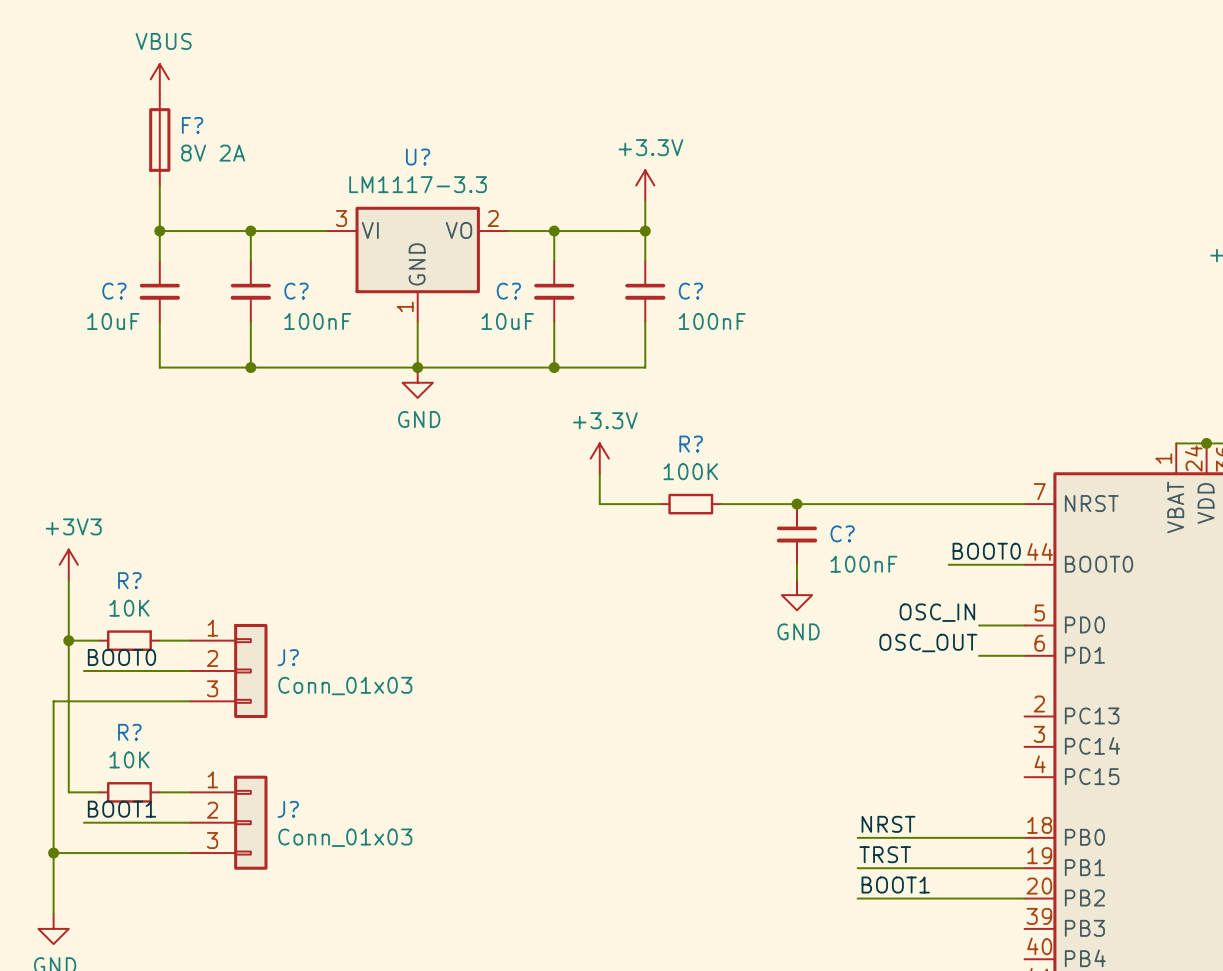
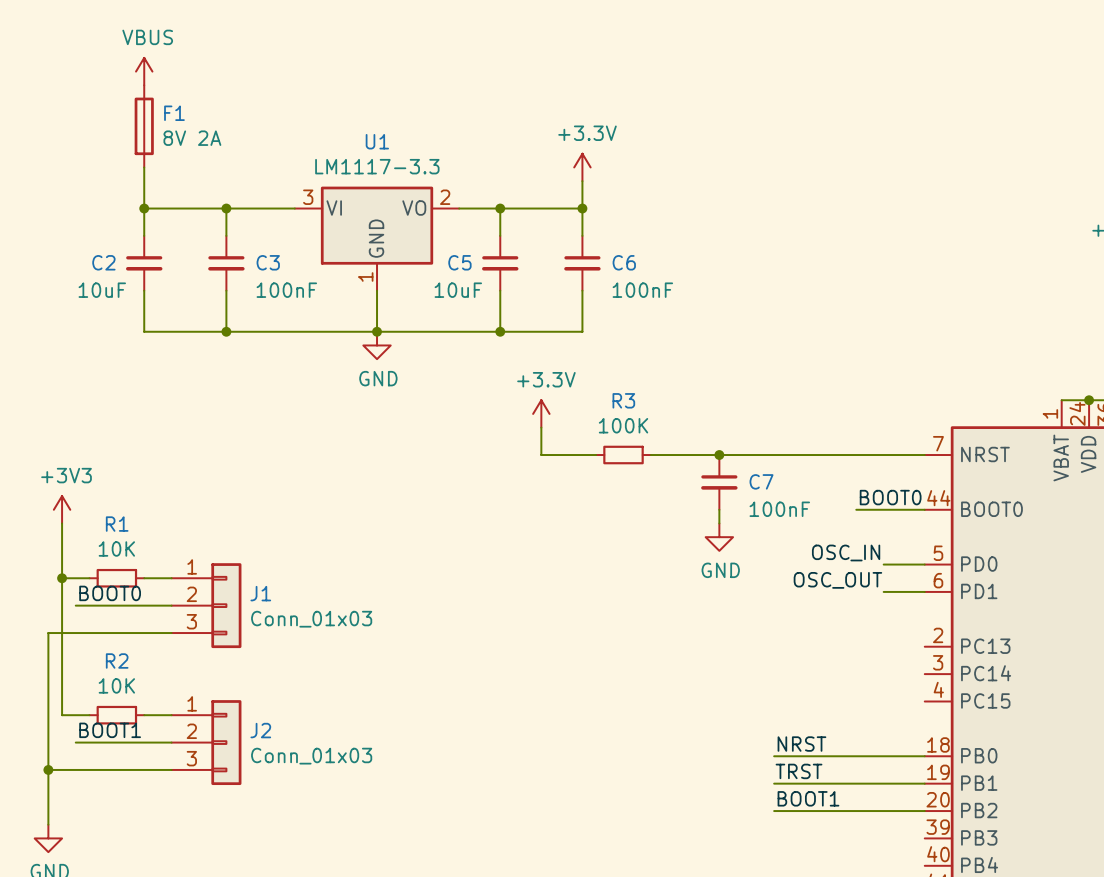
F? name: F? (192, 125) -> F1 (174, 113)
U? name: U? (418, 157) -> U1 (377, 141)
C? name: C? (114, 291) -> C2 (103, 262)
C? name: C? (296, 291) -> C3 (268, 262)
C? name: C? (508, 291) -> C5 (459, 262)
C? name: C? (690, 291) -> C6 (624, 262)
R? name: R? (691, 444) -> R3 (623, 400)
C? name: C? (842, 533) -> C7 (761, 481)
R? name: R? (129, 580) -> R1 (117, 524)
J? name: J? (288, 657) -> J1 (260, 593)
R? name: R? (129, 732) -> R2 (117, 660)
J? name: J? (288, 809) -> J2 (260, 730)

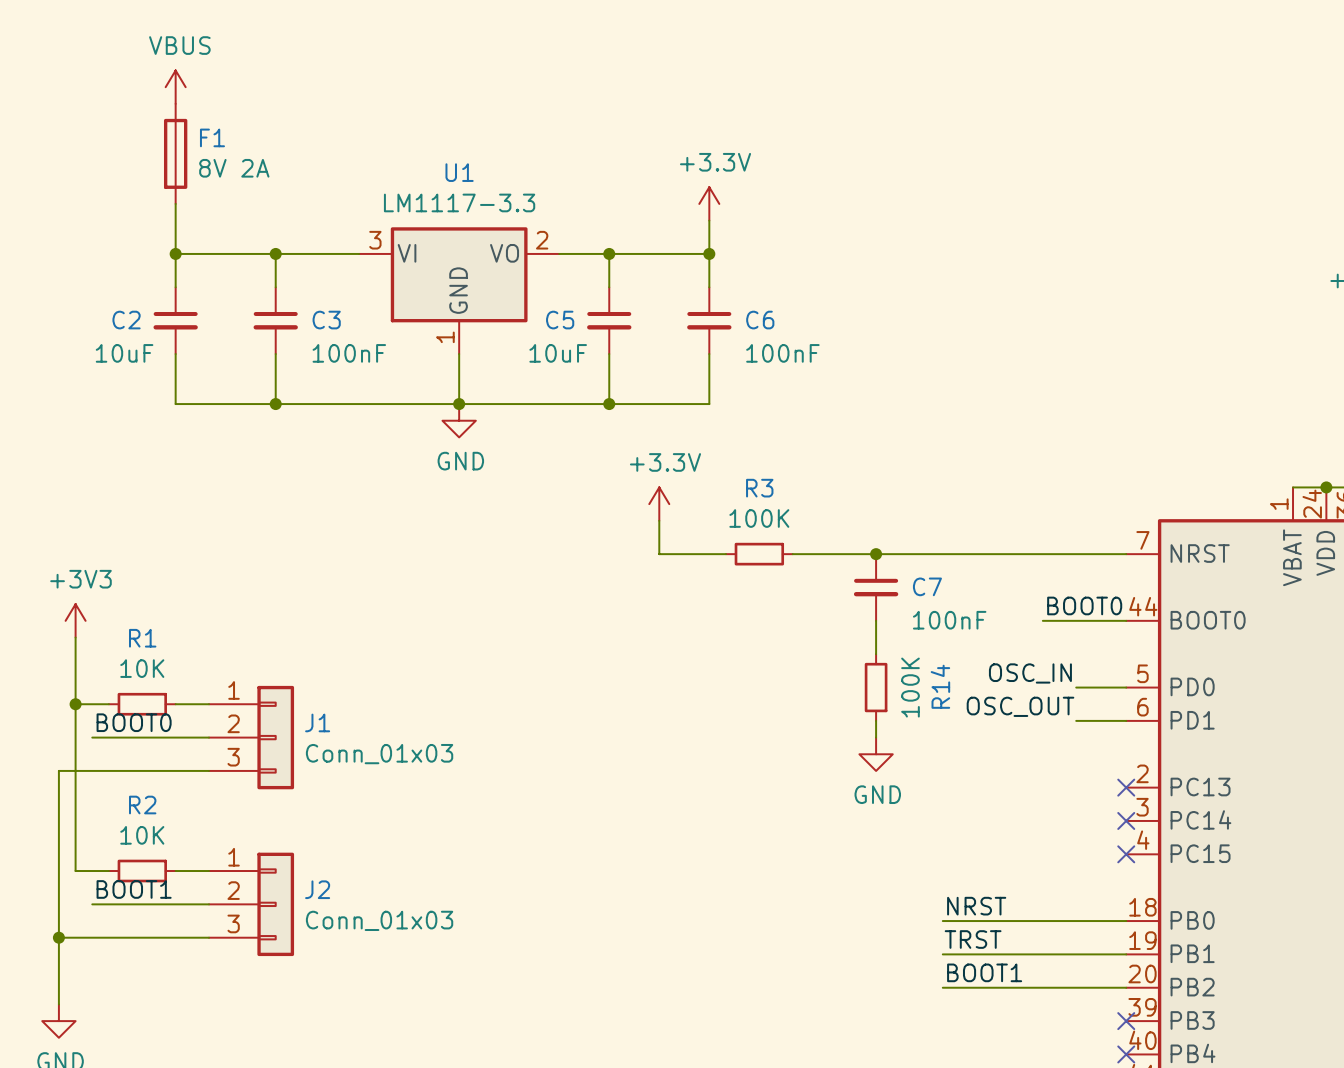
power symbol position: GND (719, 537) -> GND (876, 754)
R14: none -> 100K (876, 687)
wire: none -> (876, 720) (876, 737)
no-connect mark: none -> (1126, 787)
no-connect mark: none -> (1126, 820)
no-connect mark: none -> (1126, 854)
no-connect mark: none -> (1126, 1021)
no-connect mark: none -> (1126, 1054)

